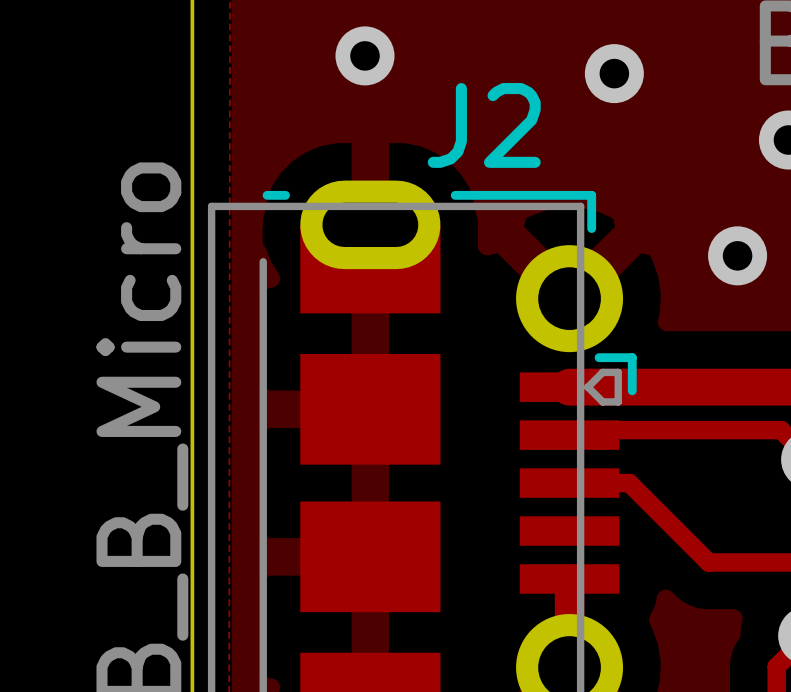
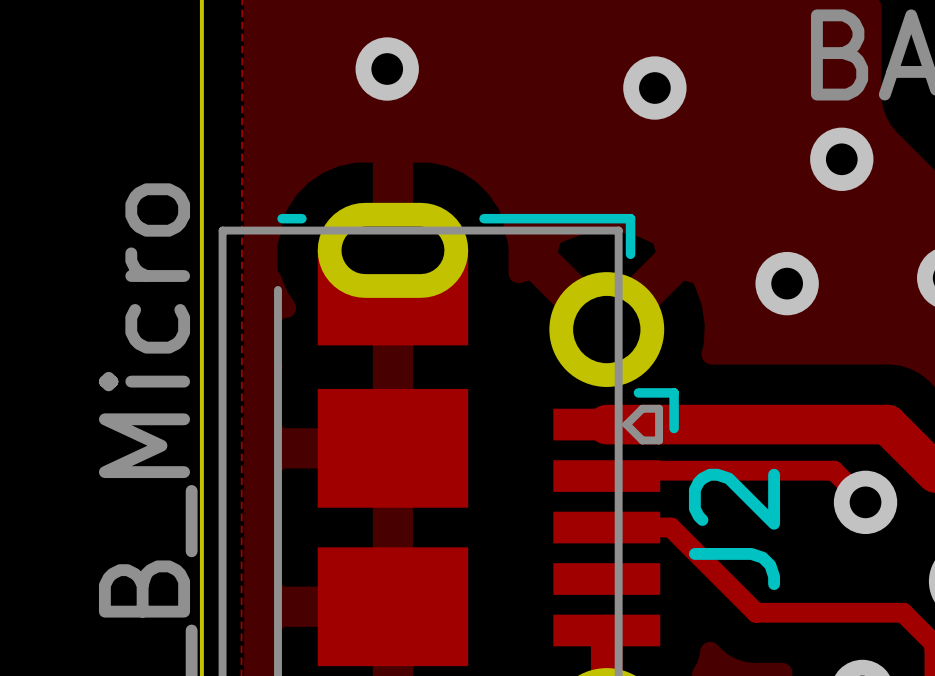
J2 name rotation: 0° (484, 125) -> 90° counterclockwise (734, 529)
J2 name position: J2 (484, 125) -> J2 (734, 529)

